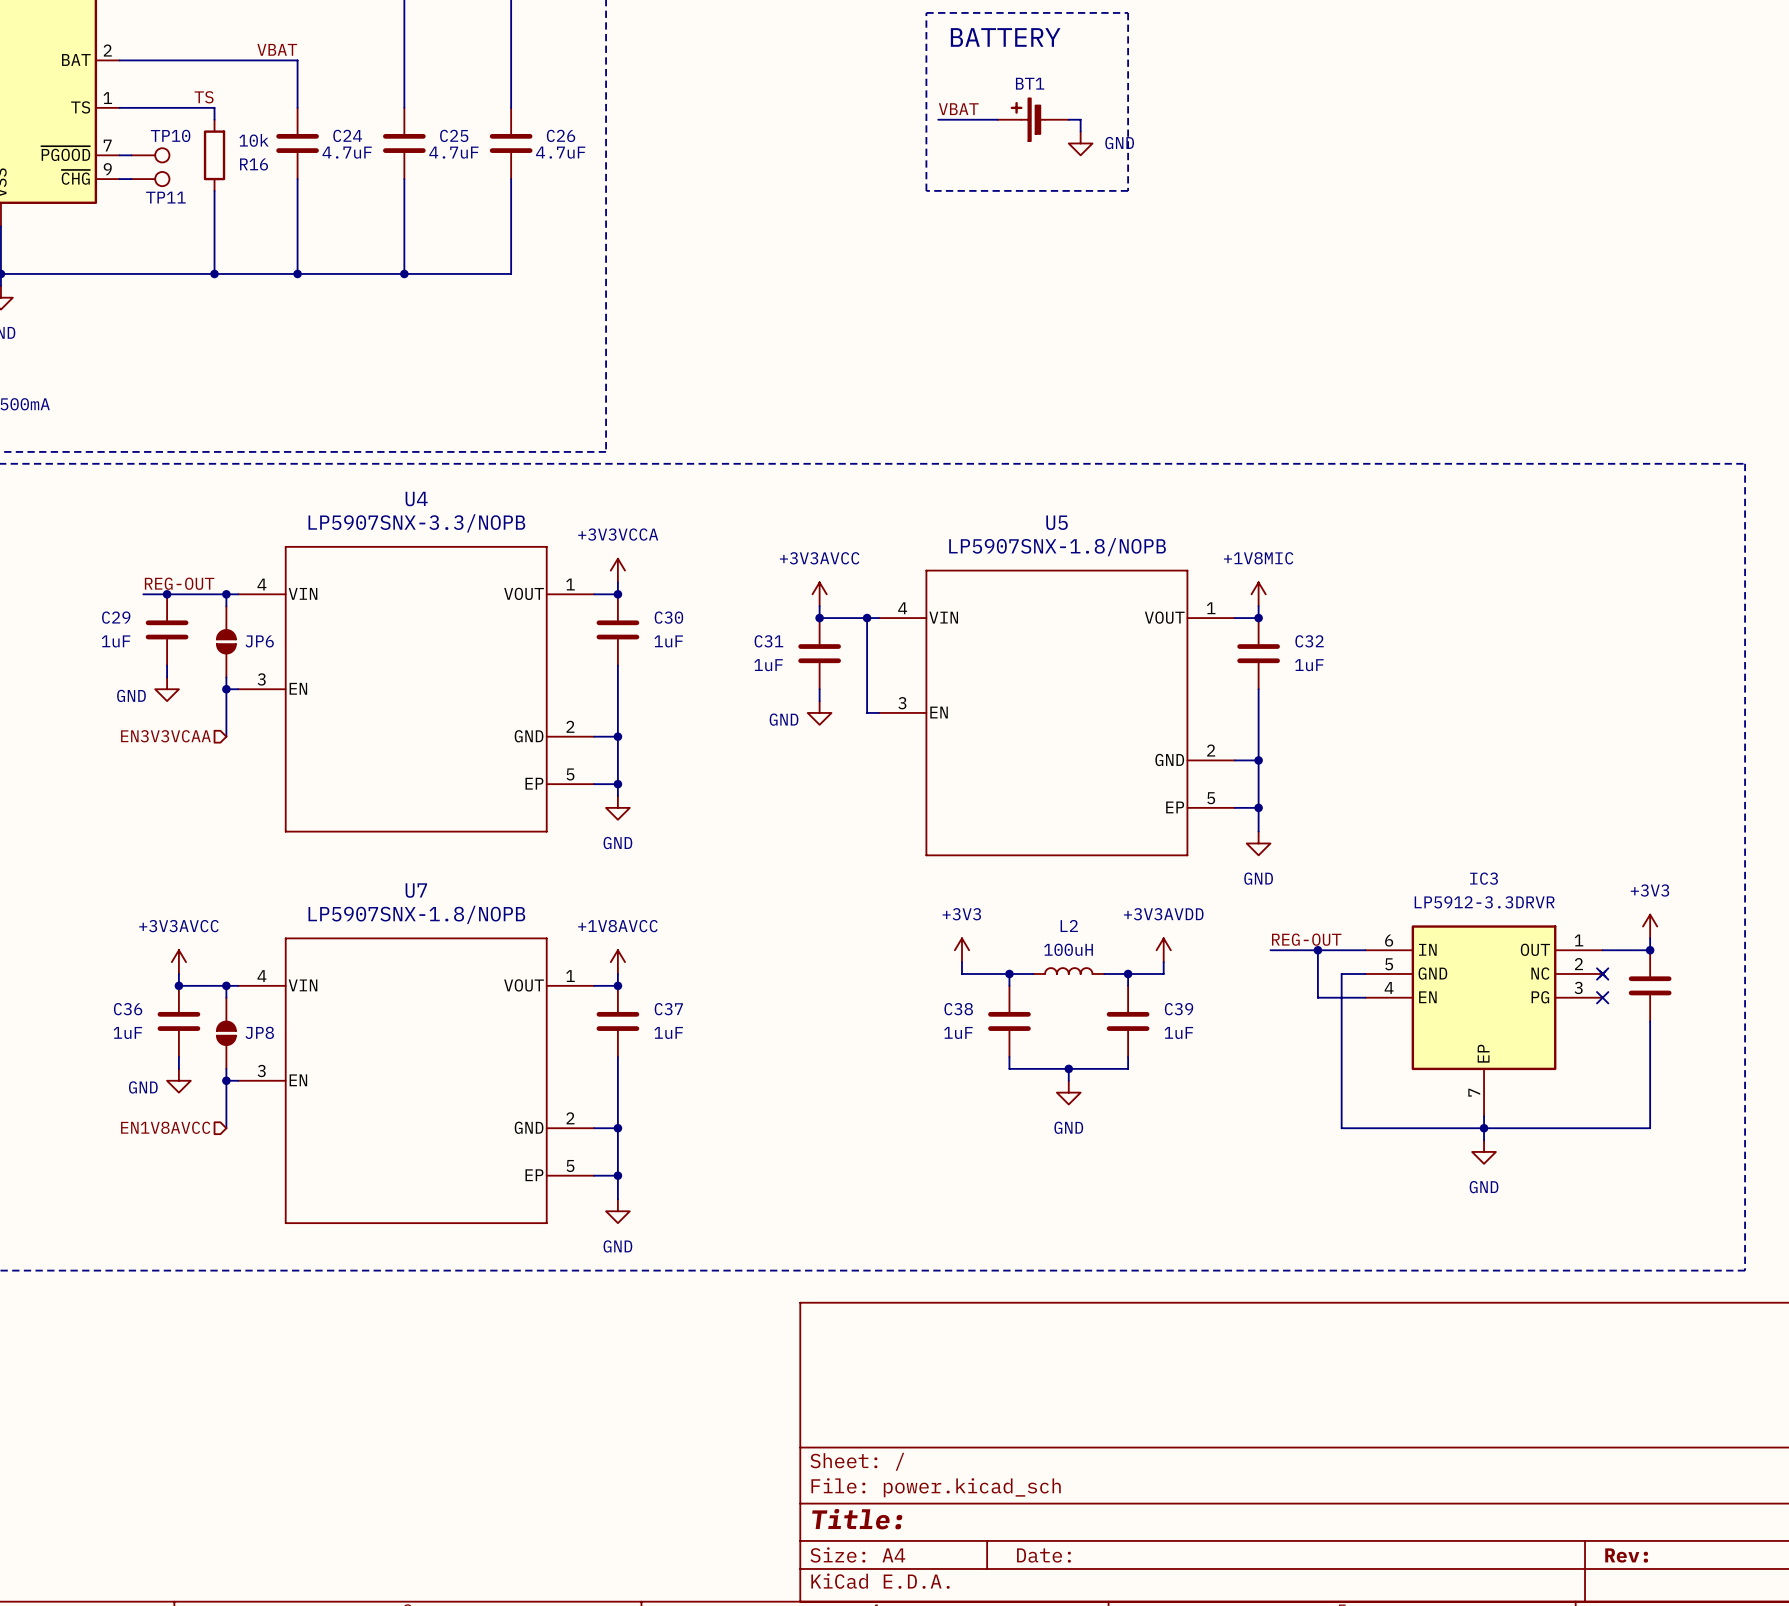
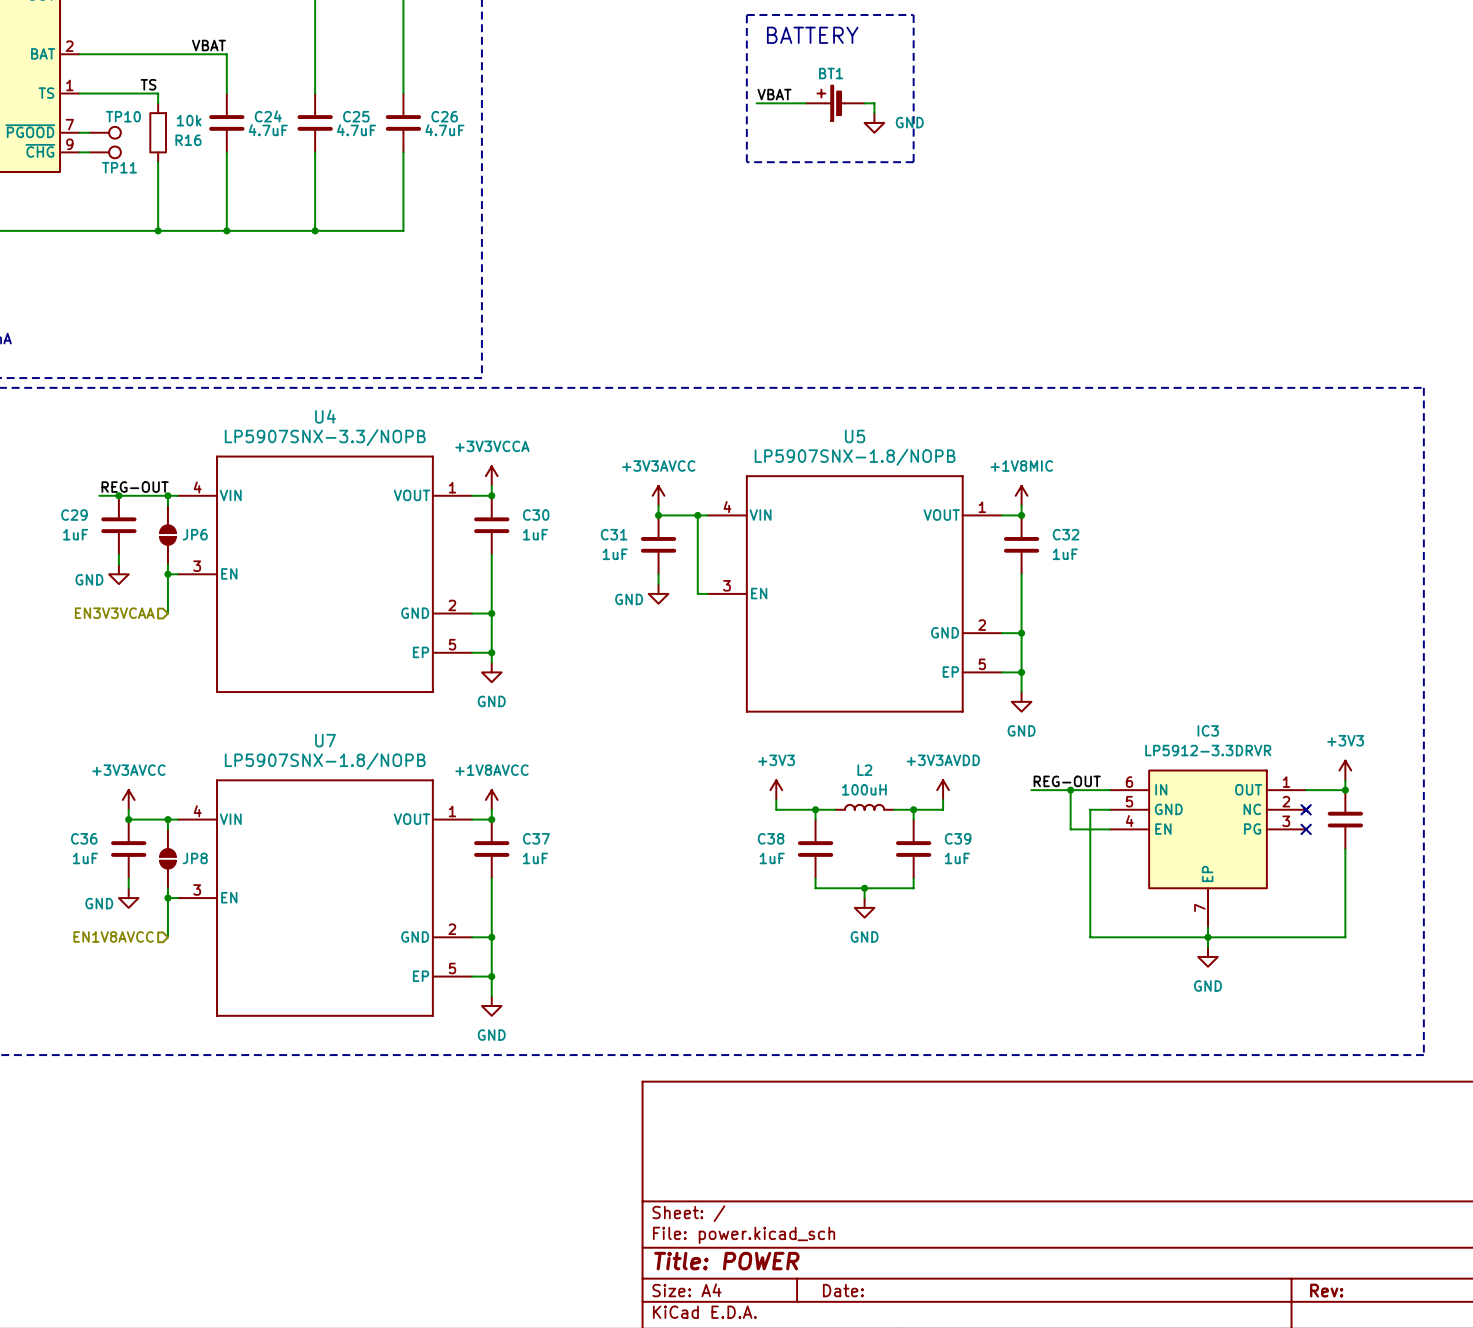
title block: Title: (857, 1519) -> Title: POWER (726, 1261)

